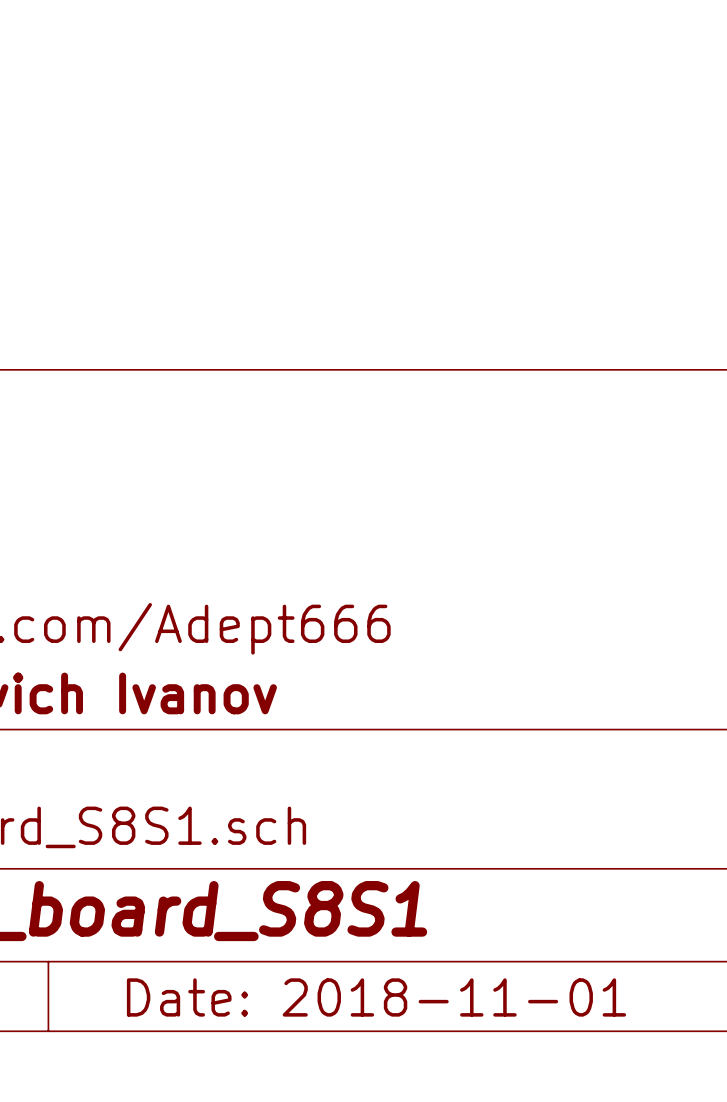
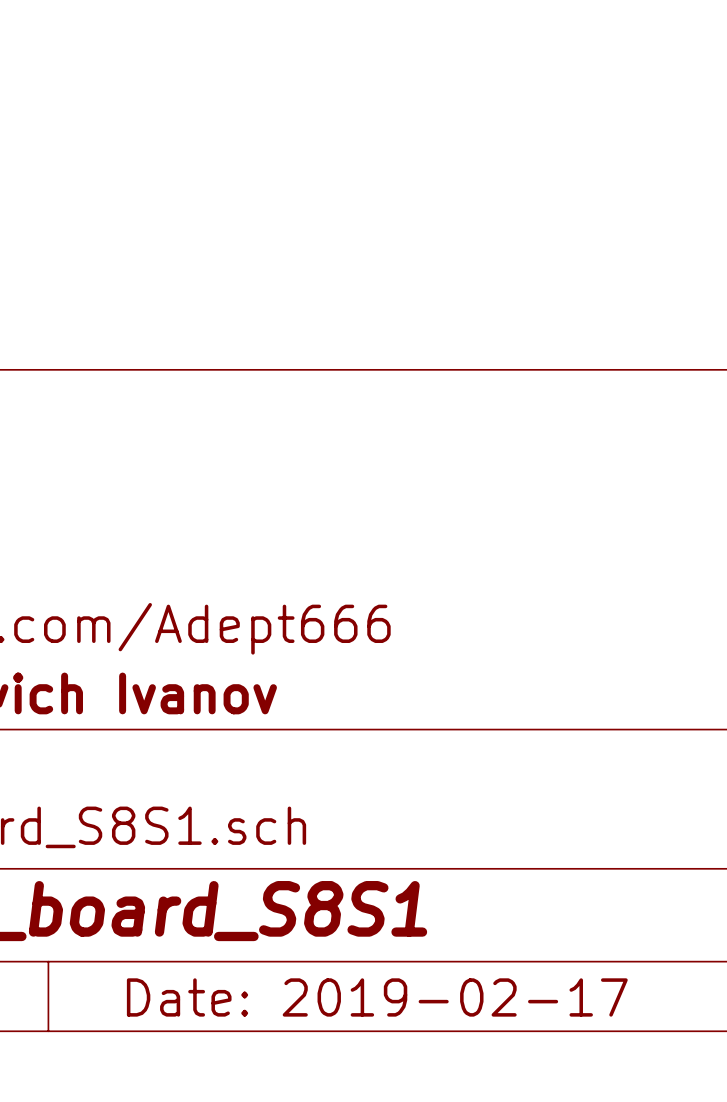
title block: Date: 2018-11-01 (376, 997) -> Date: 2019-02-17 (377, 997)

